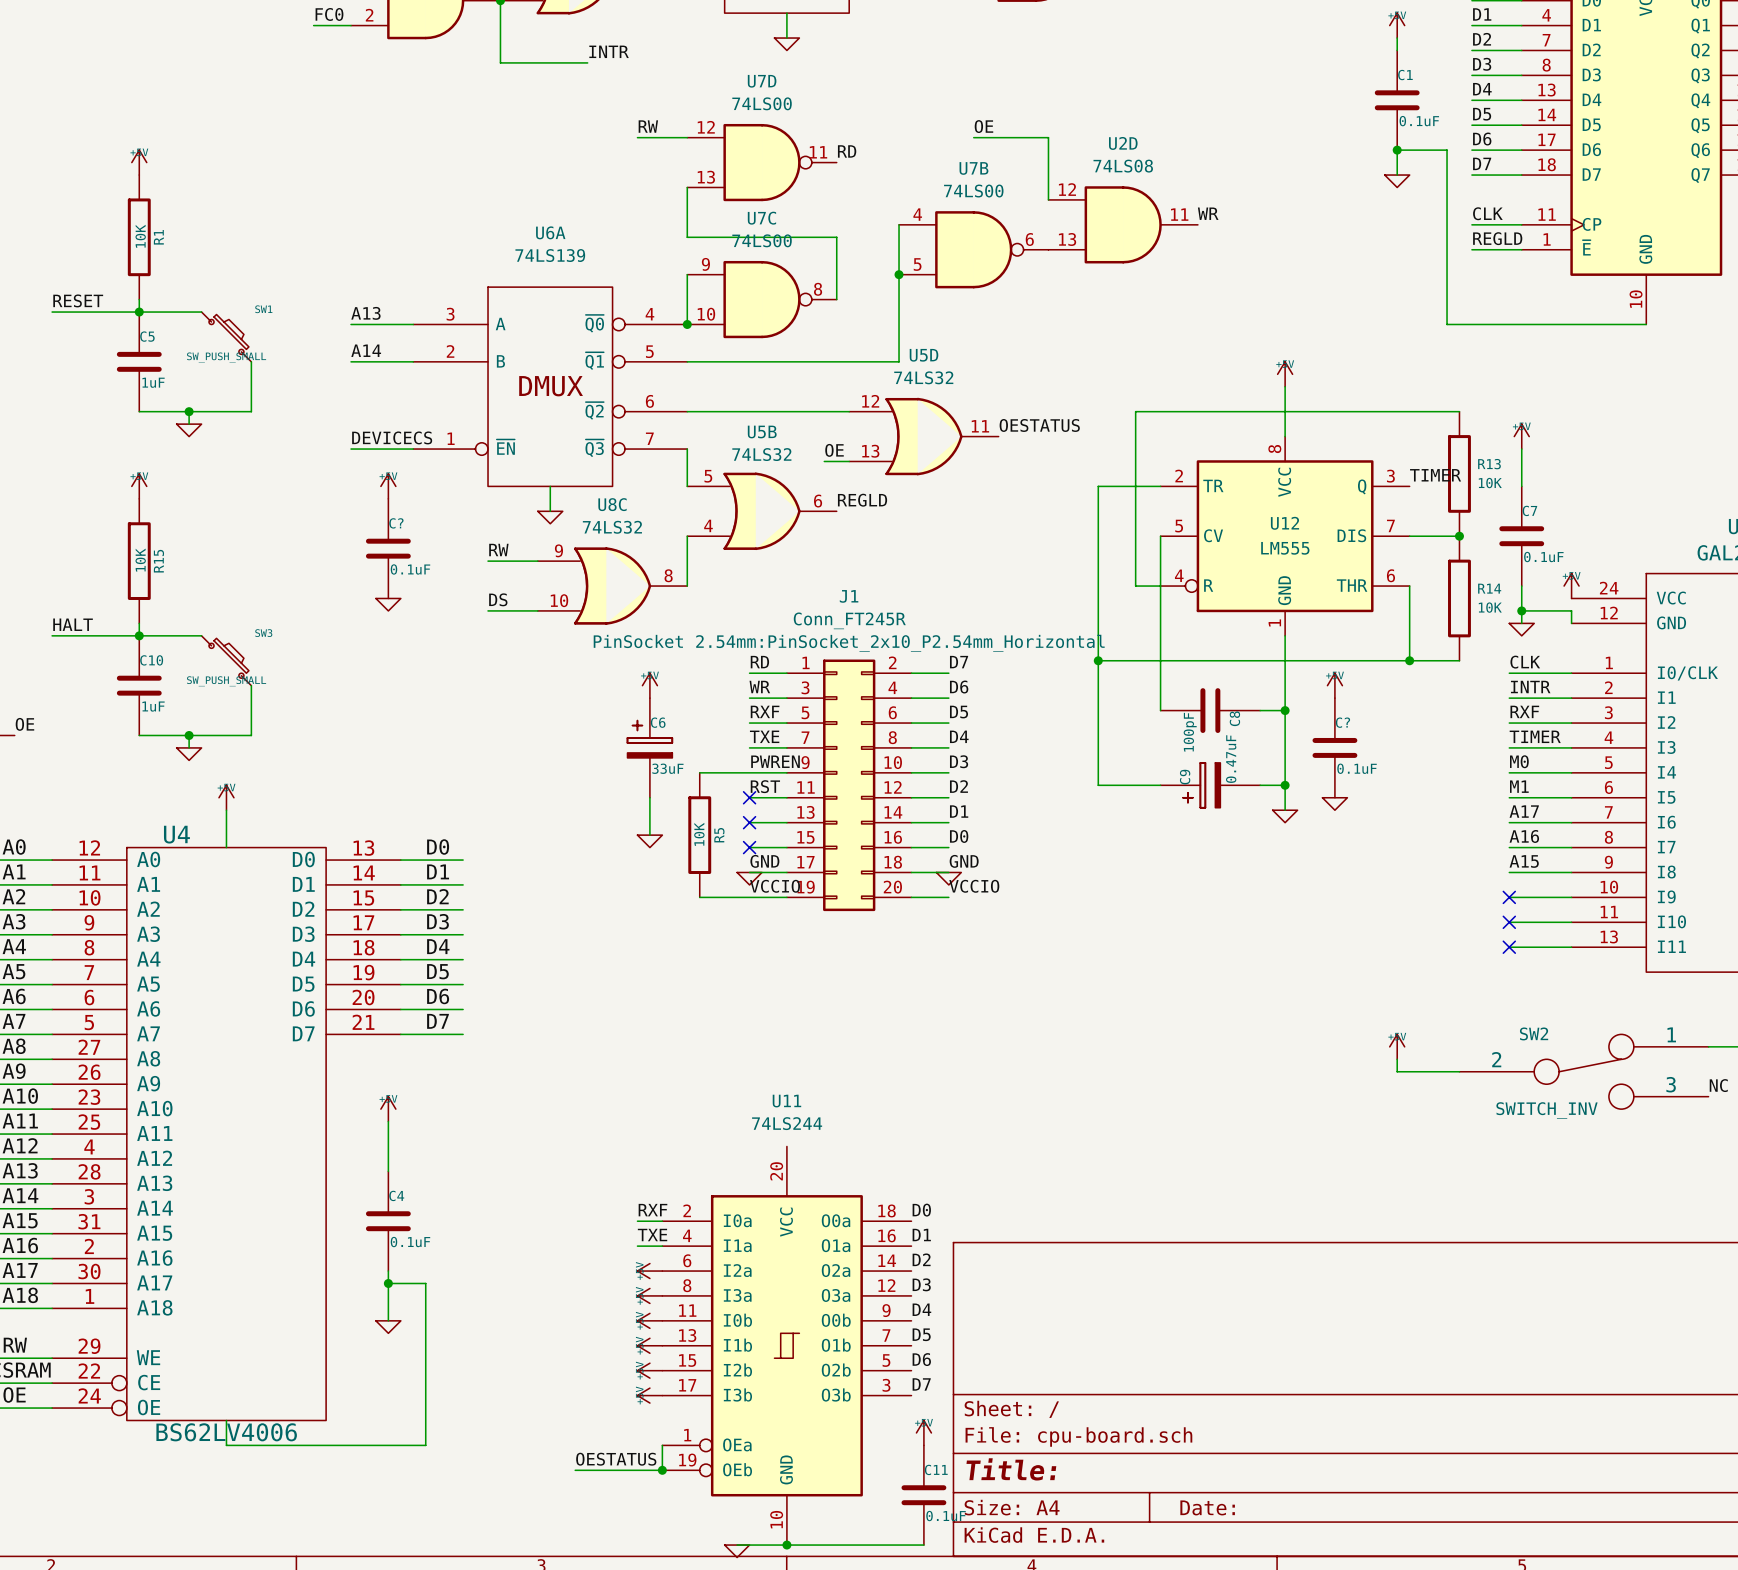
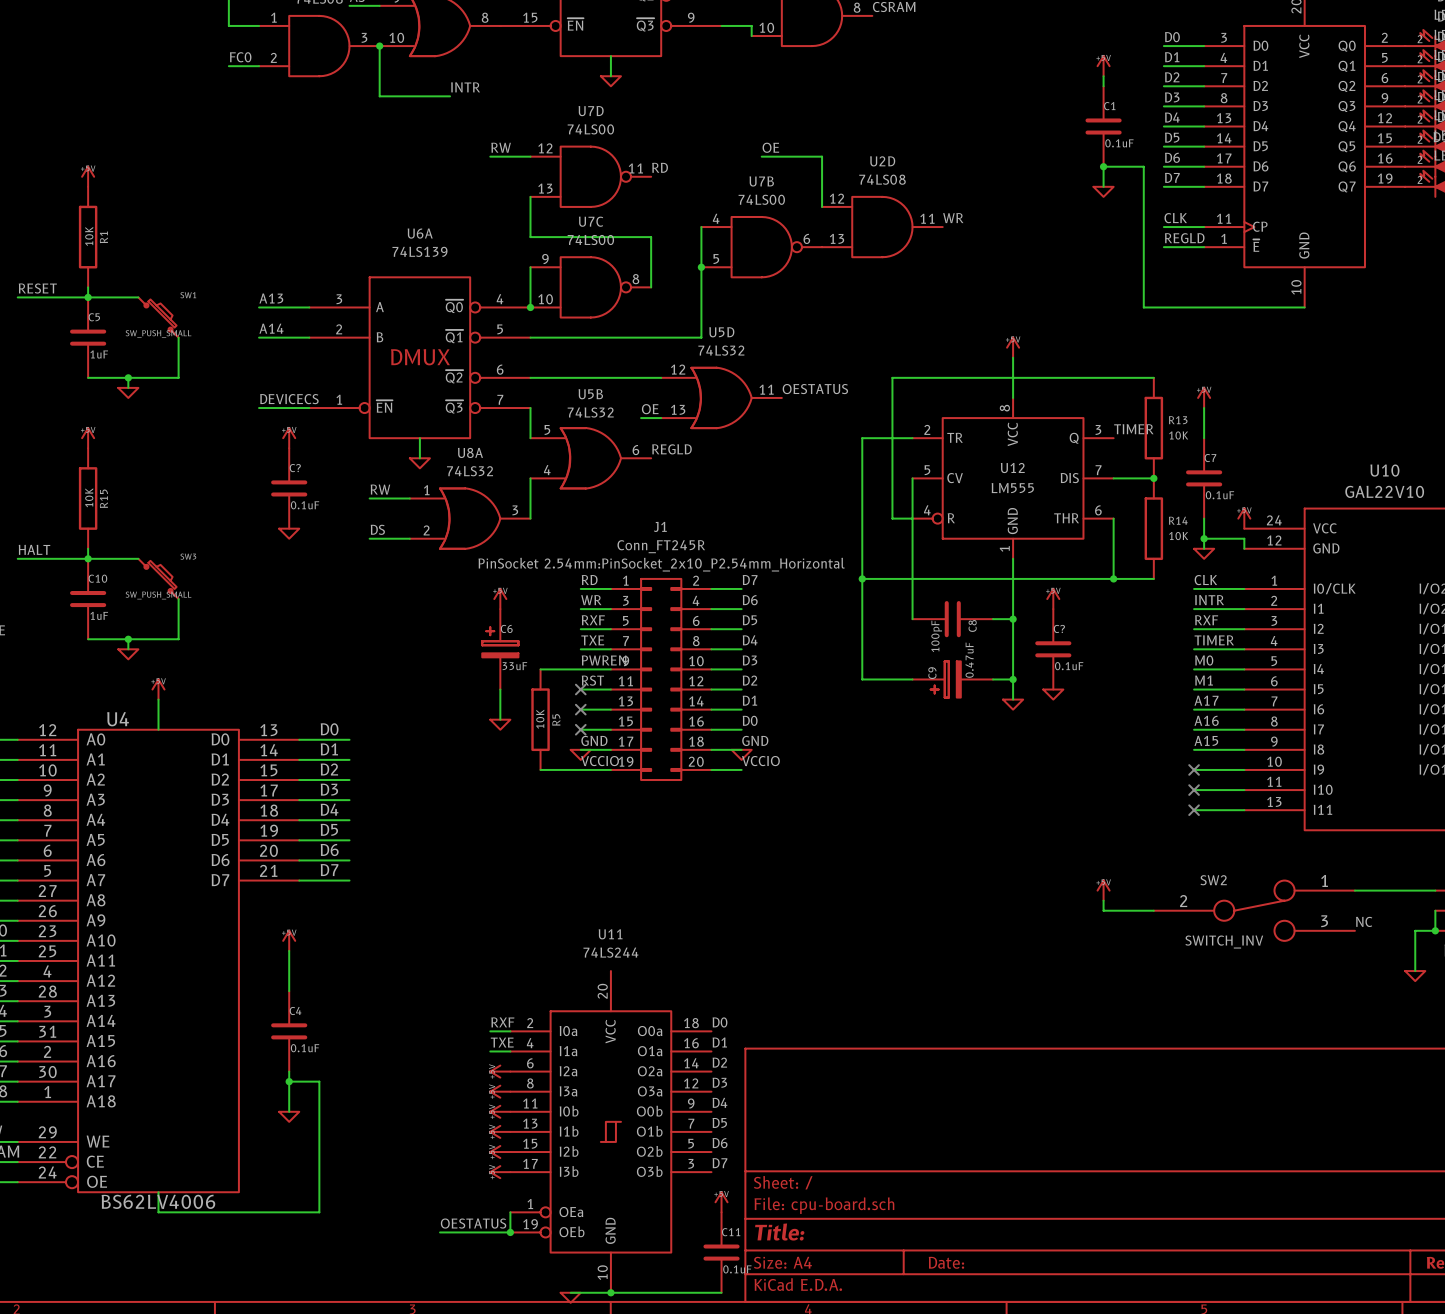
U8C name: U8C (612, 504) -> U8A (470, 452)
U8C pin number: 9 (558, 550) -> 1 (426, 490)
U8C pin number: 8 (668, 575) -> 3 (515, 510)
U8C pin number: 10 (559, 600) -> 2 (426, 530)

